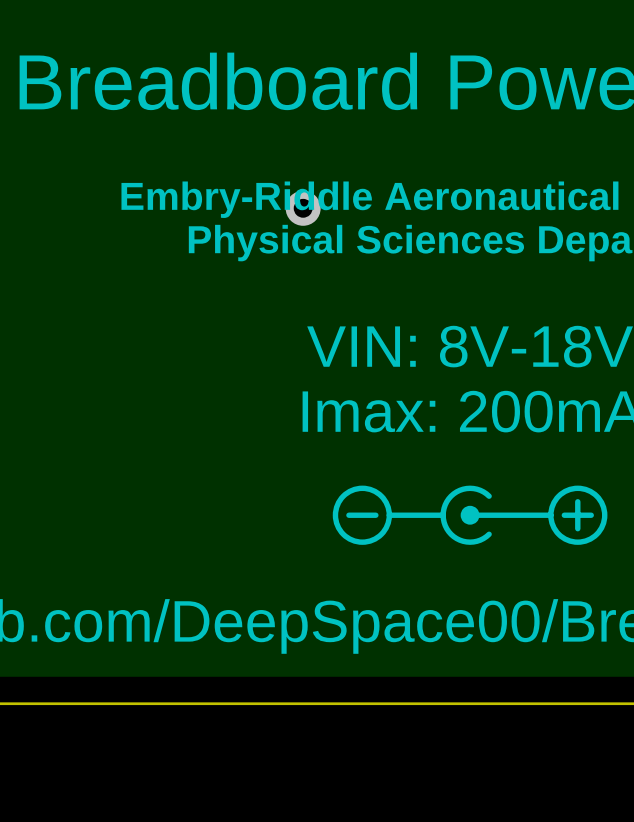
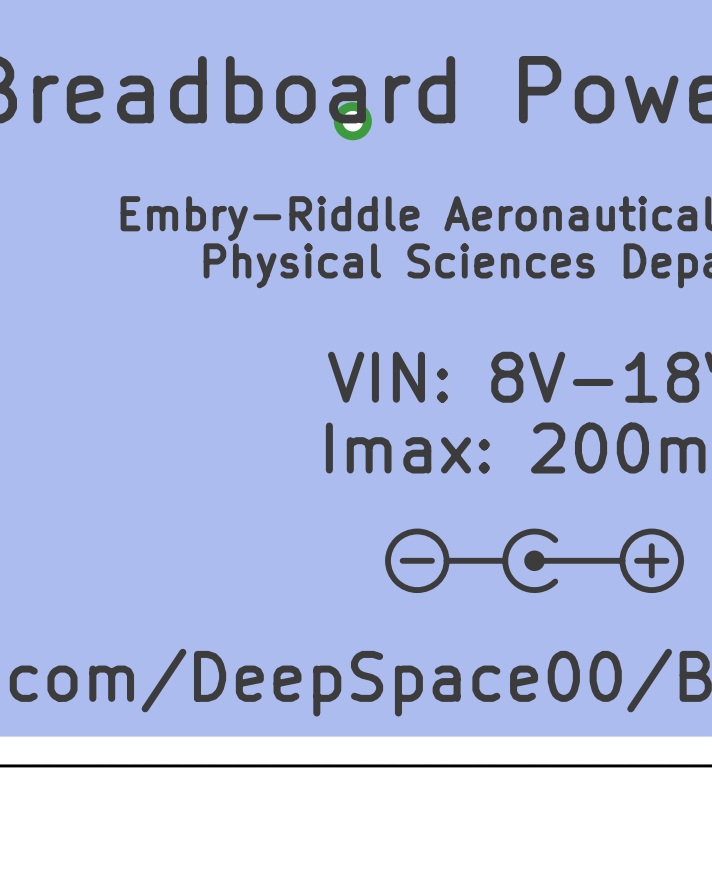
via position: (303, 208) -> (352, 121)

